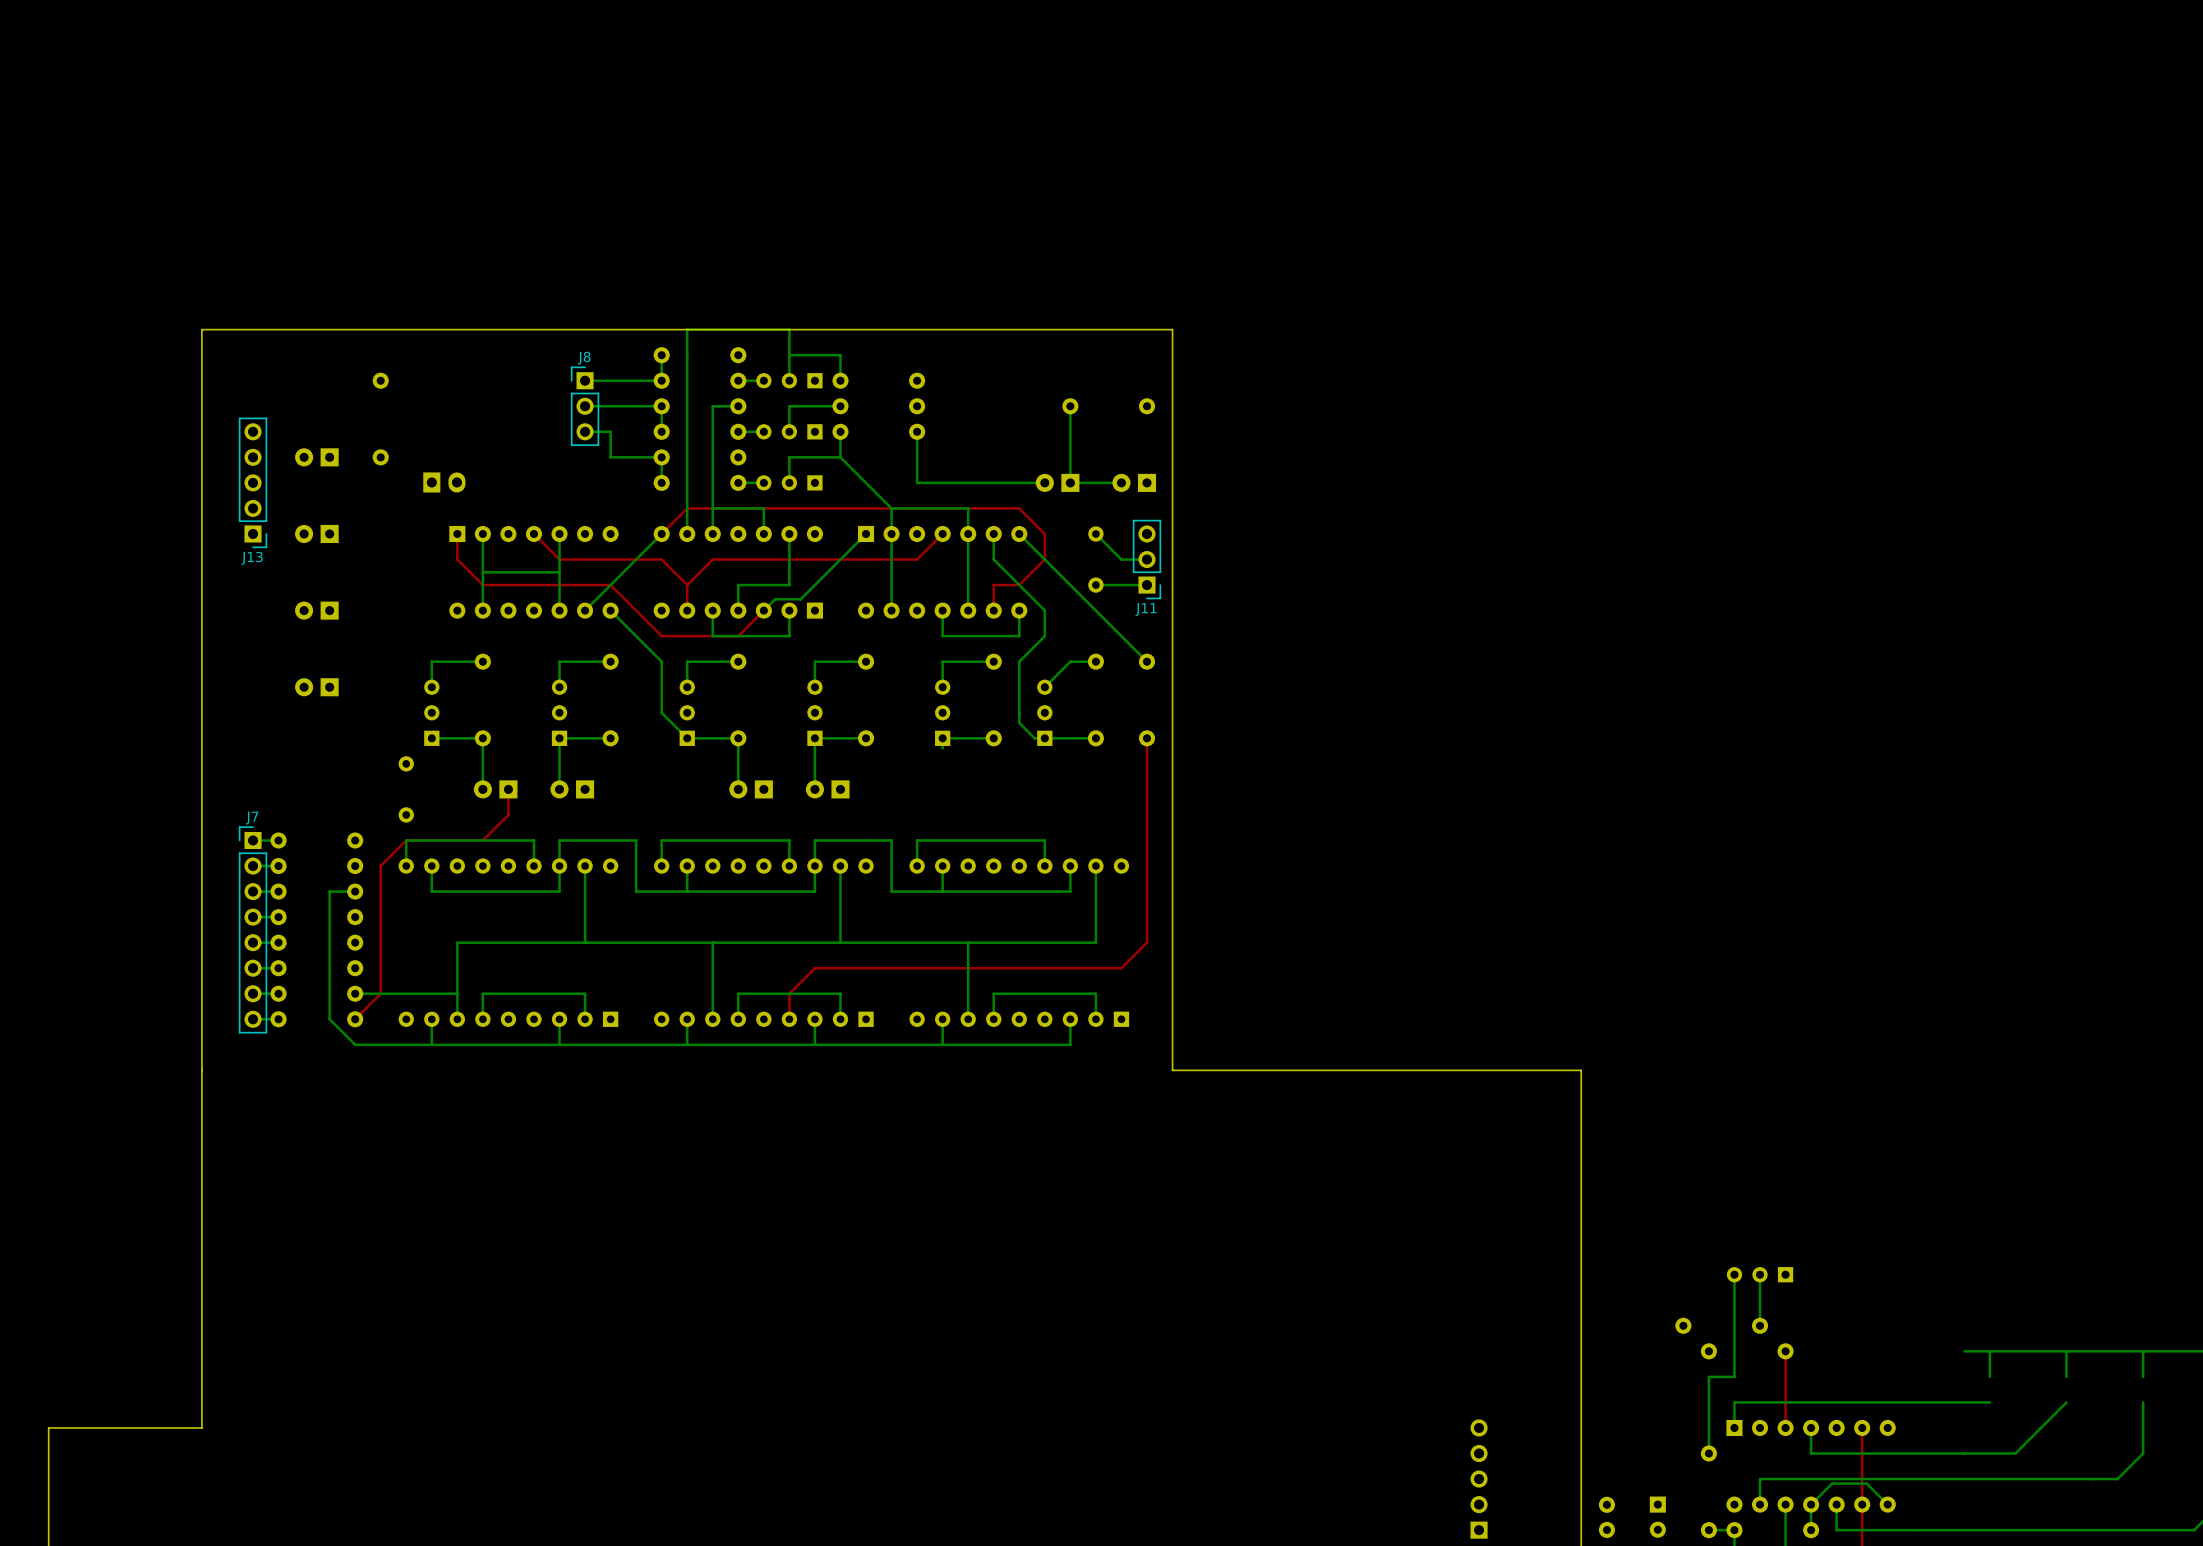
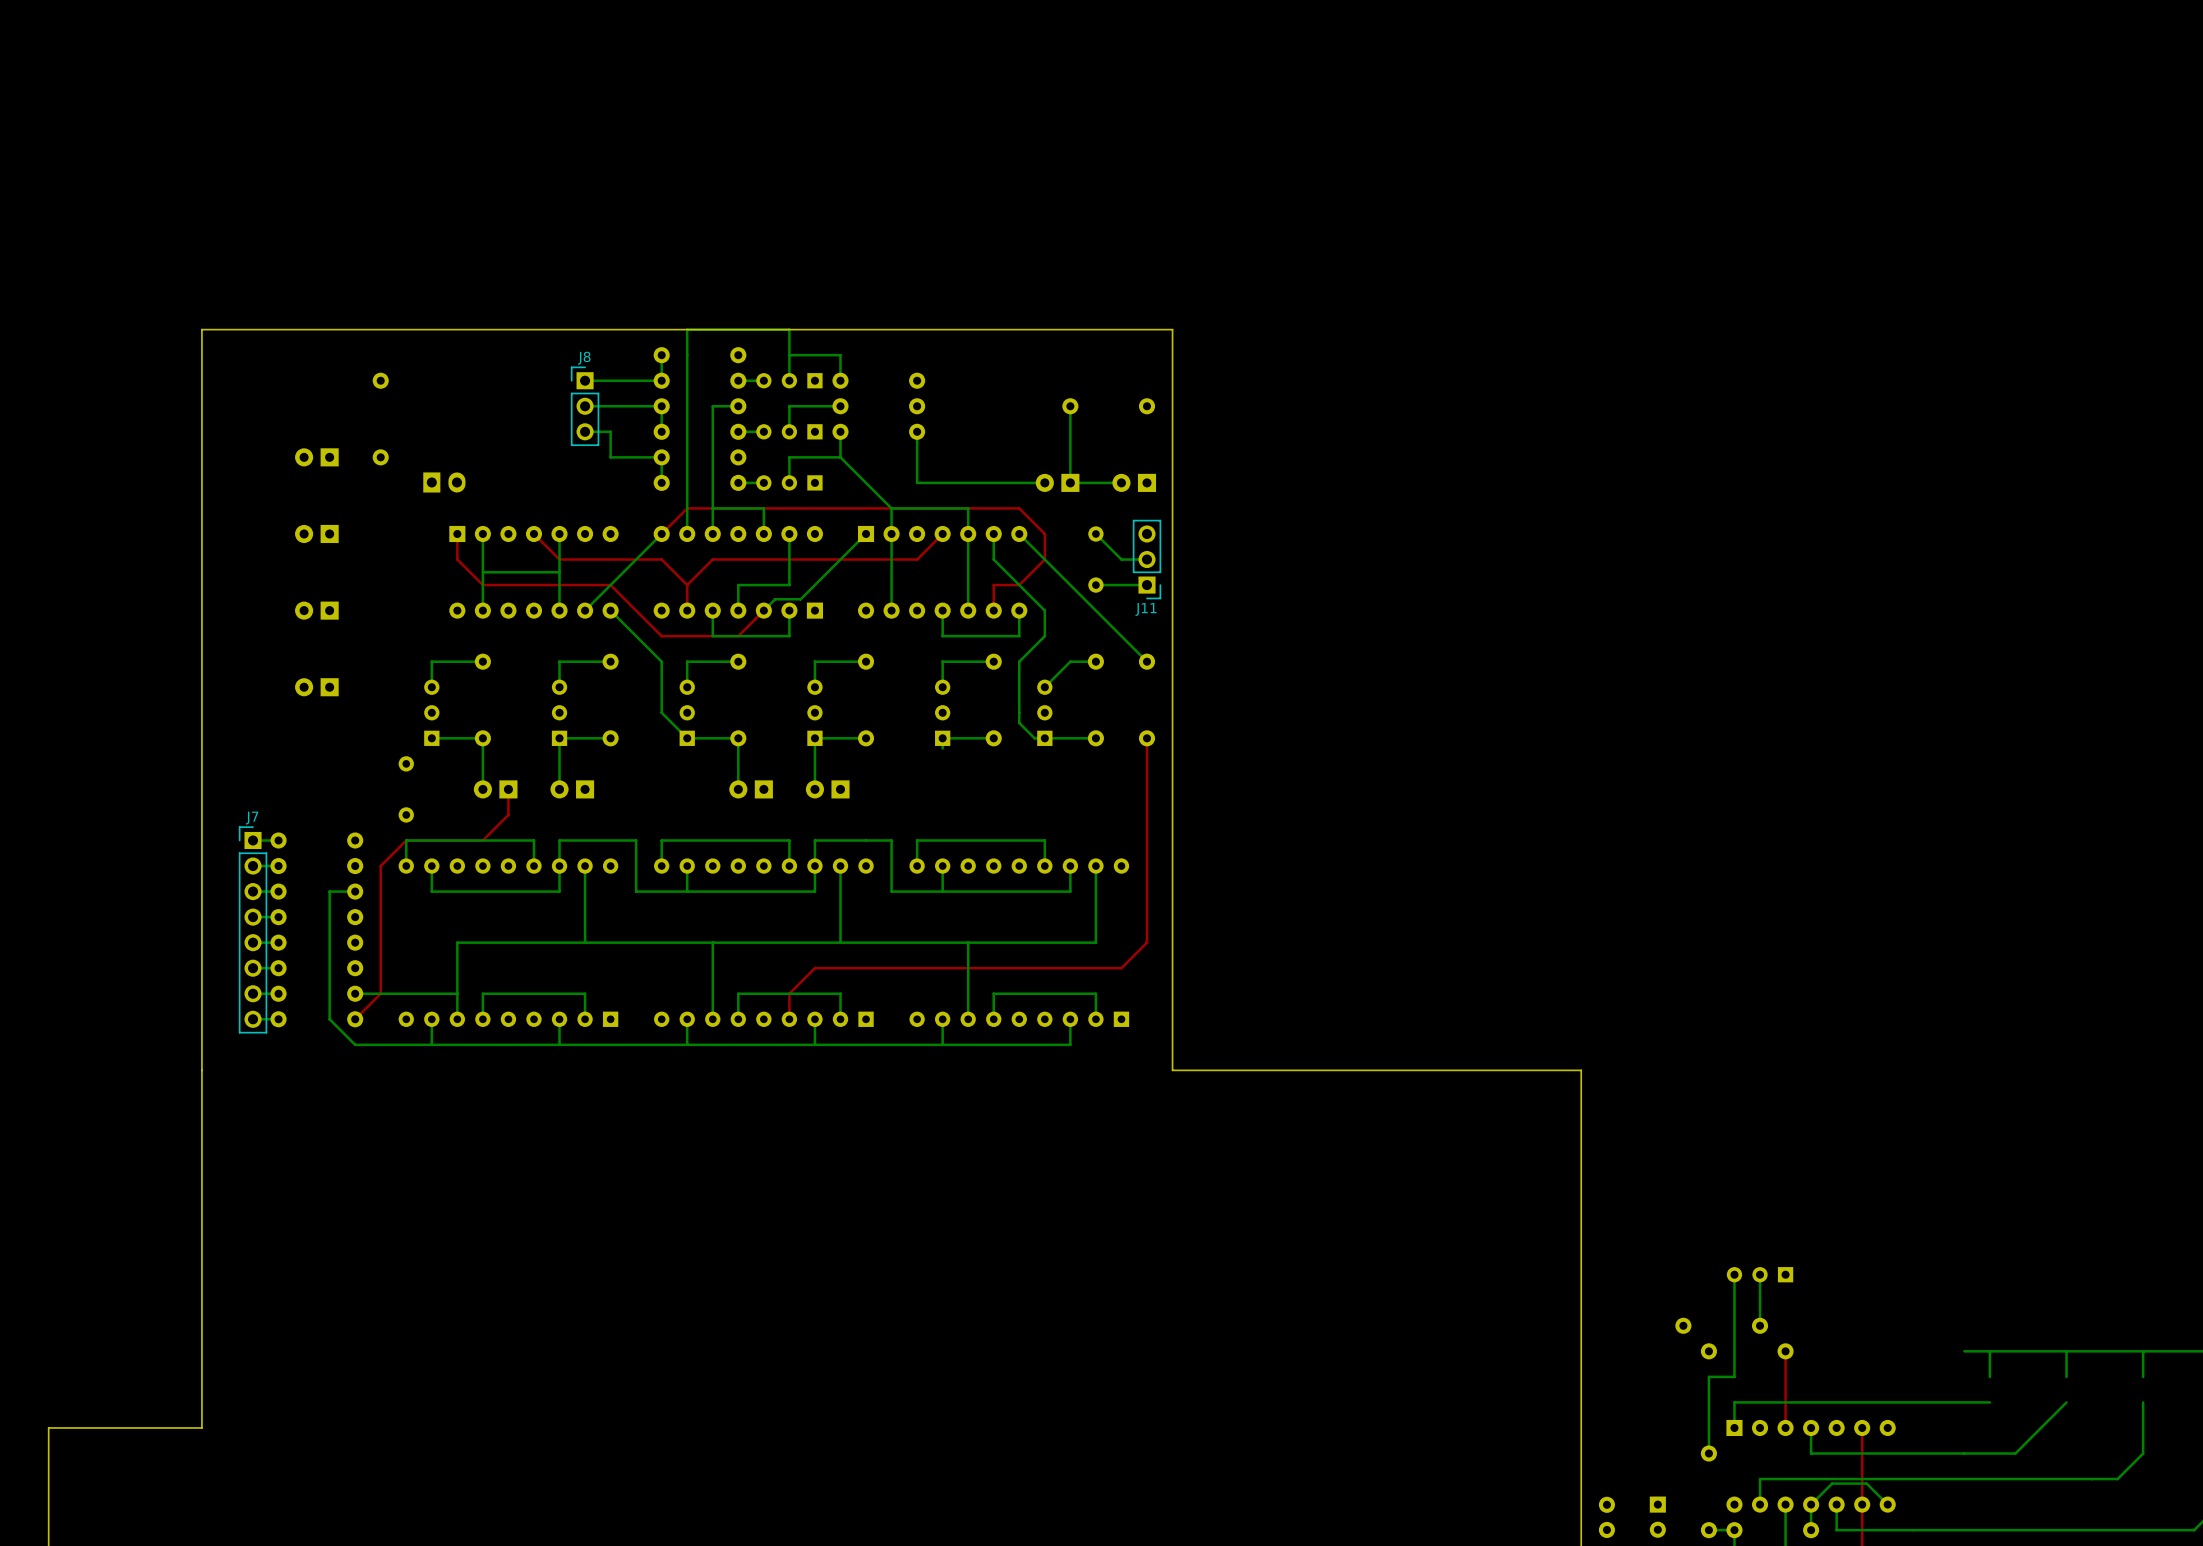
J13: (253, 482) -> none
part: (1479, 1479) -> none

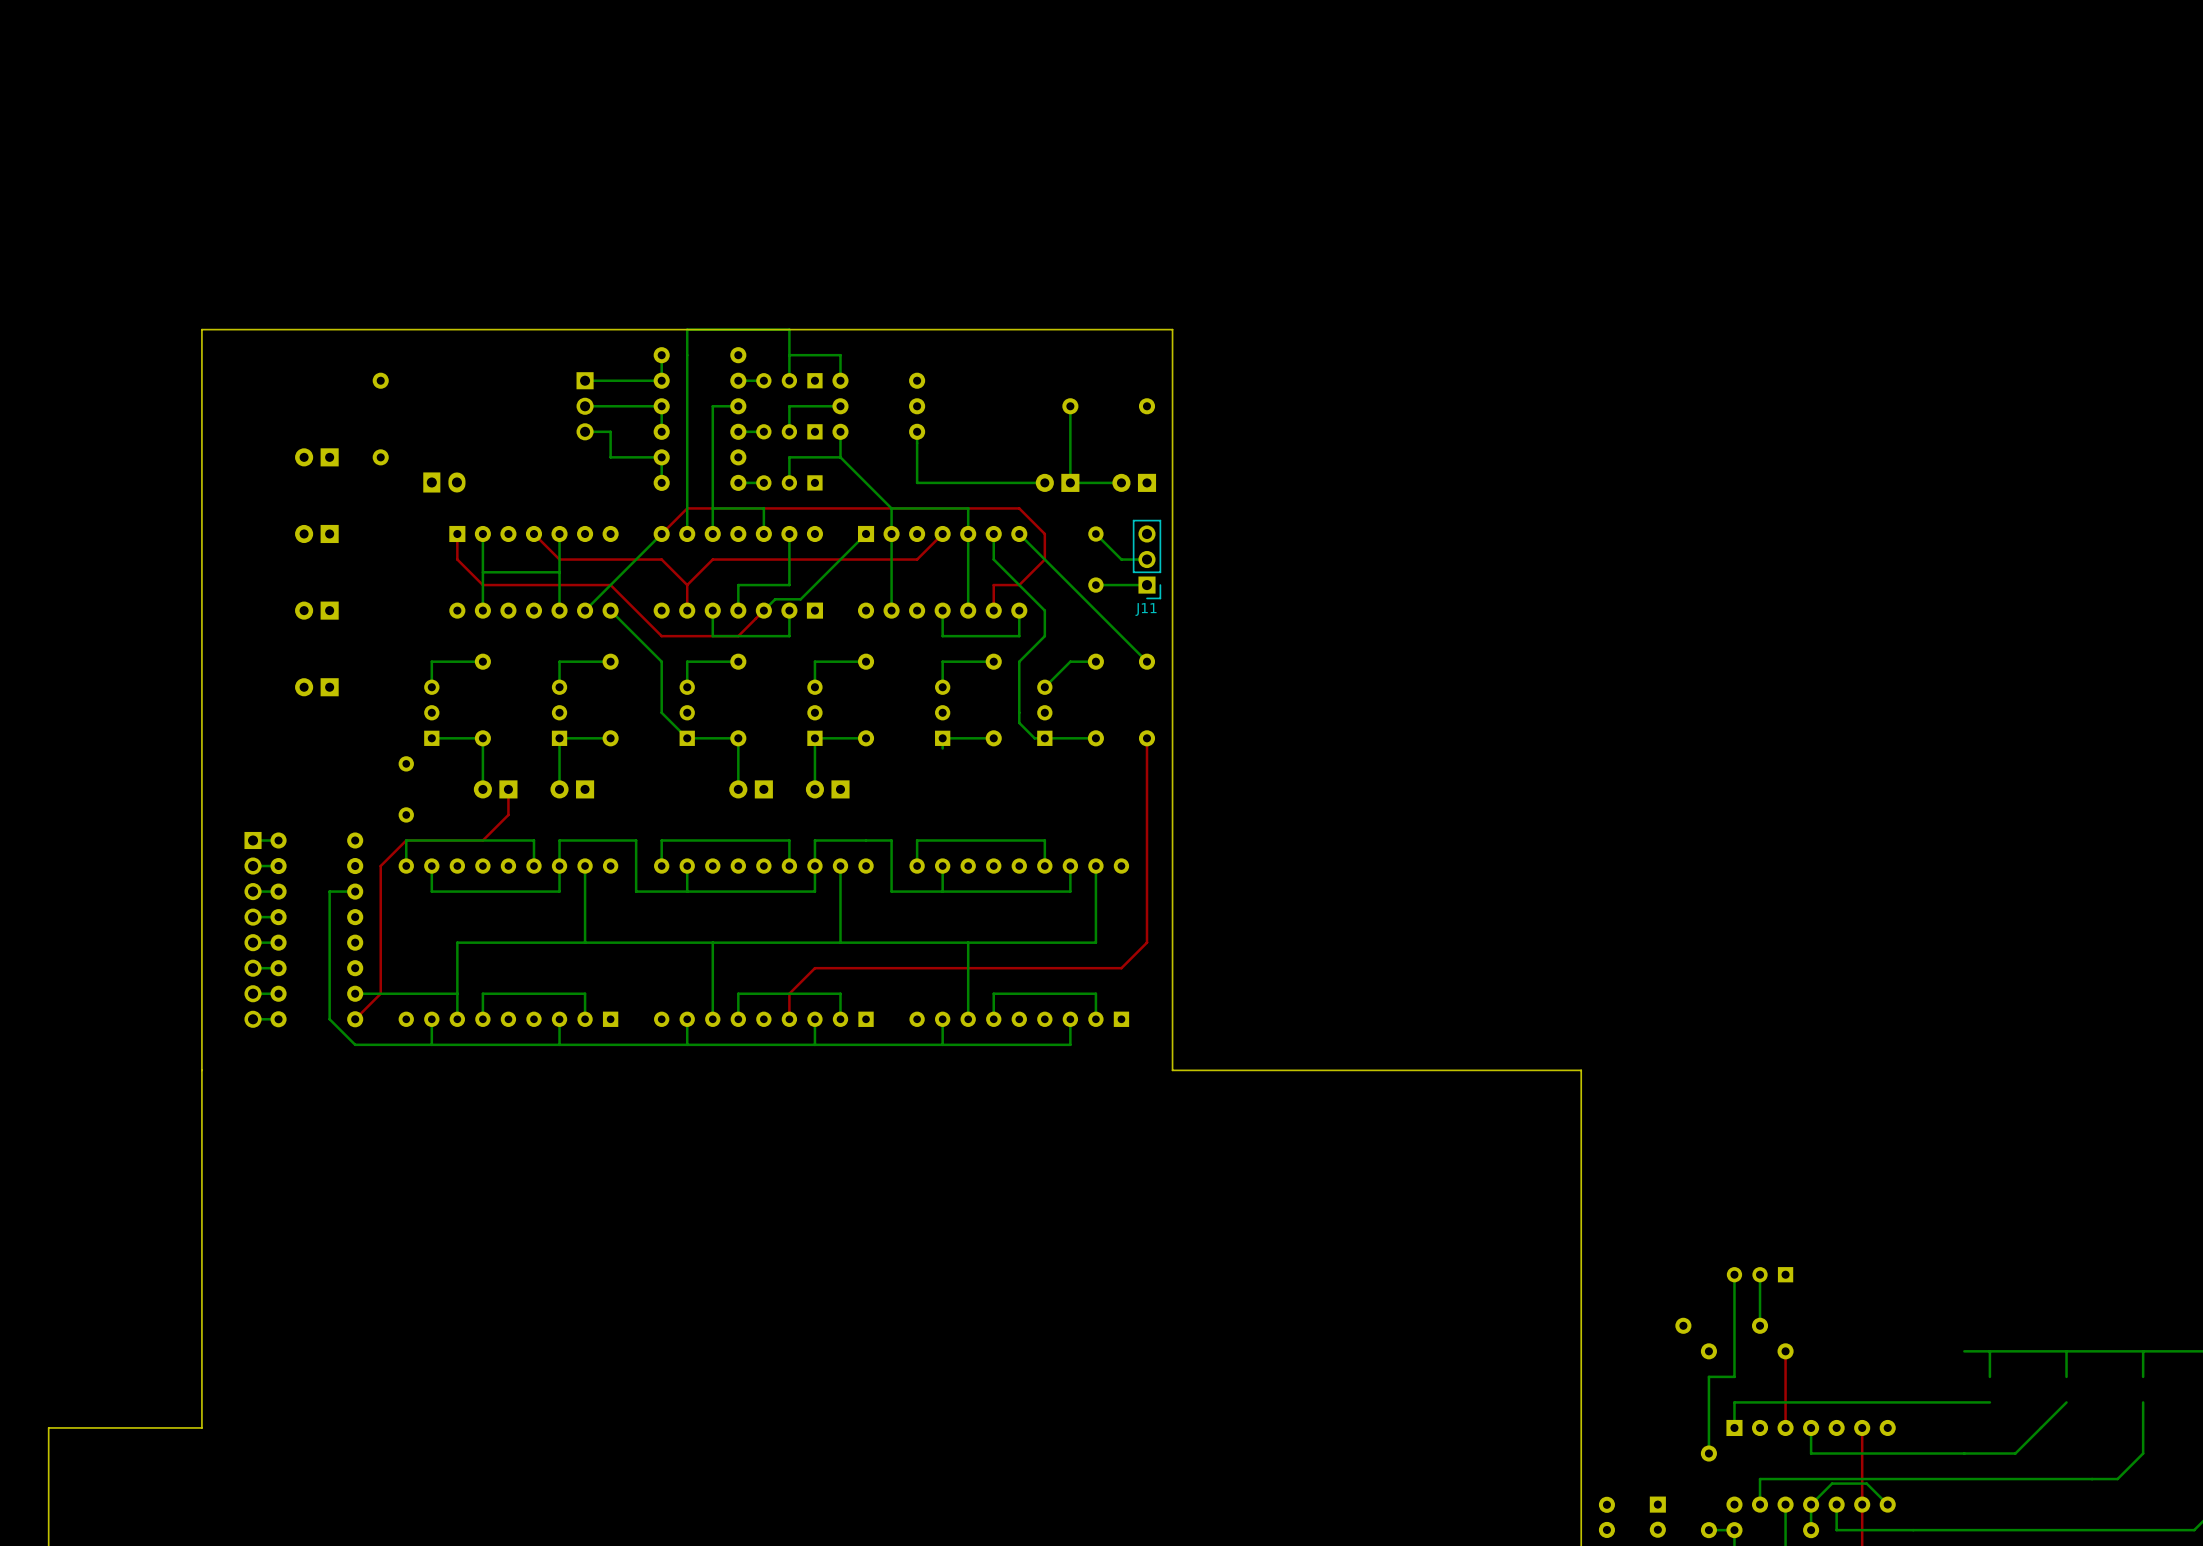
J8 side: bottom (585, 406) -> top (585, 406)
J7 side: bottom (253, 929) -> top (253, 929)

